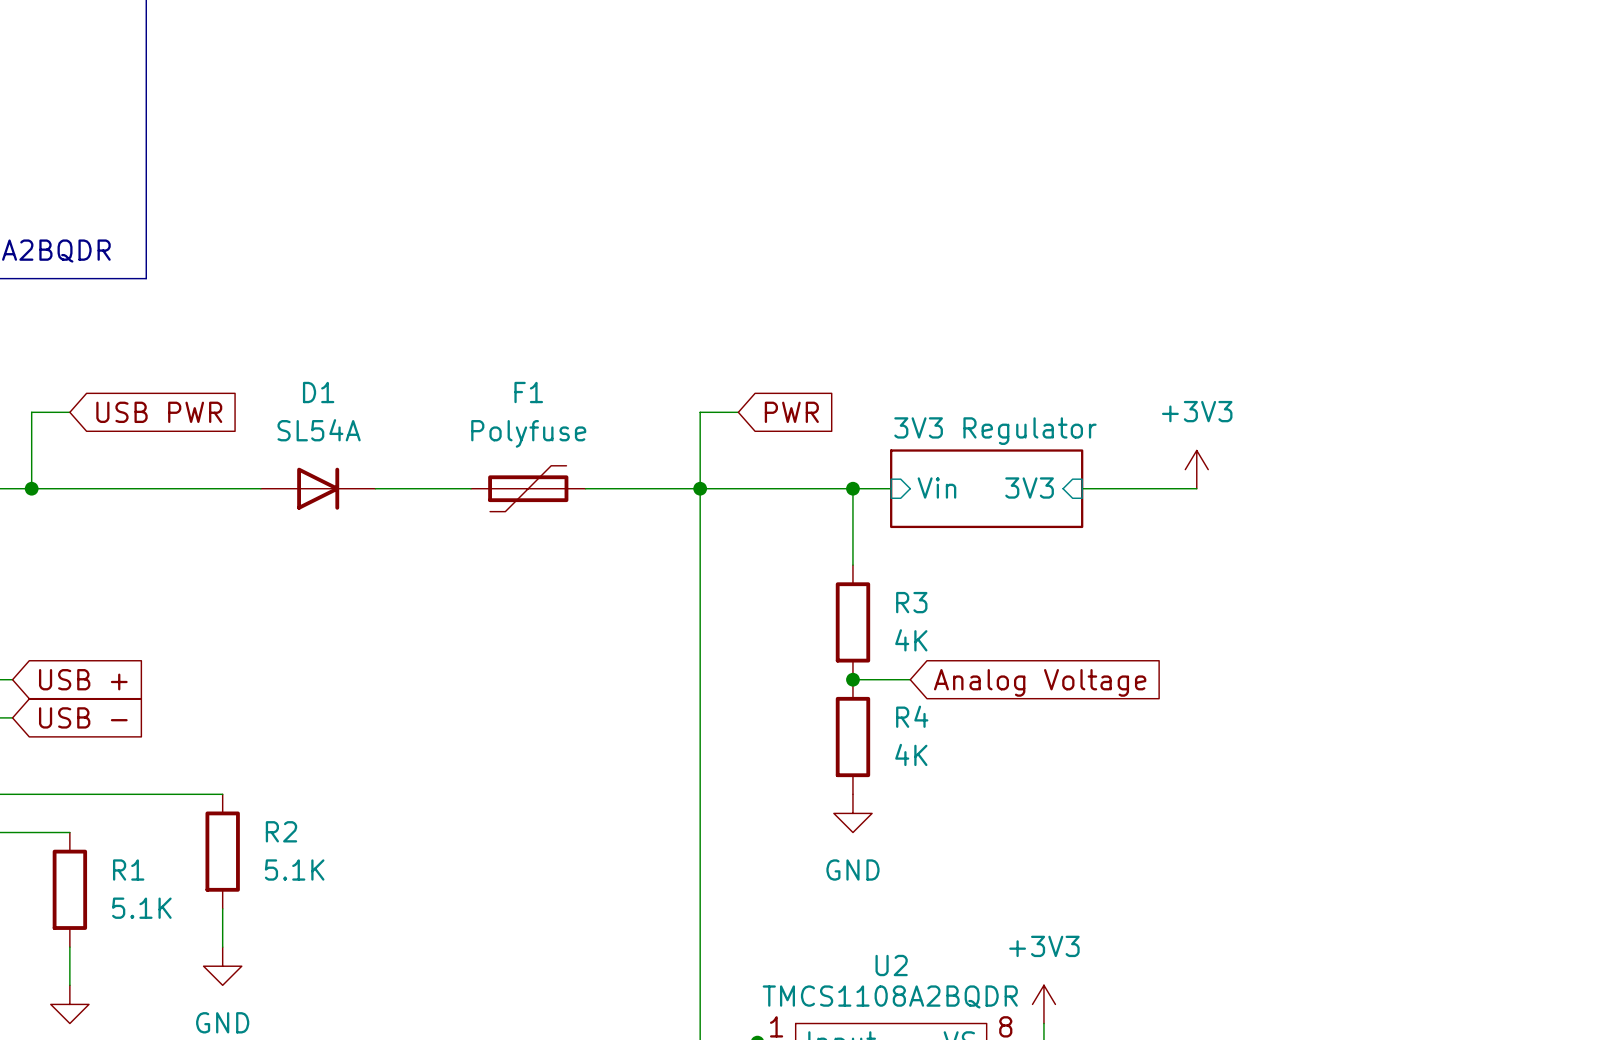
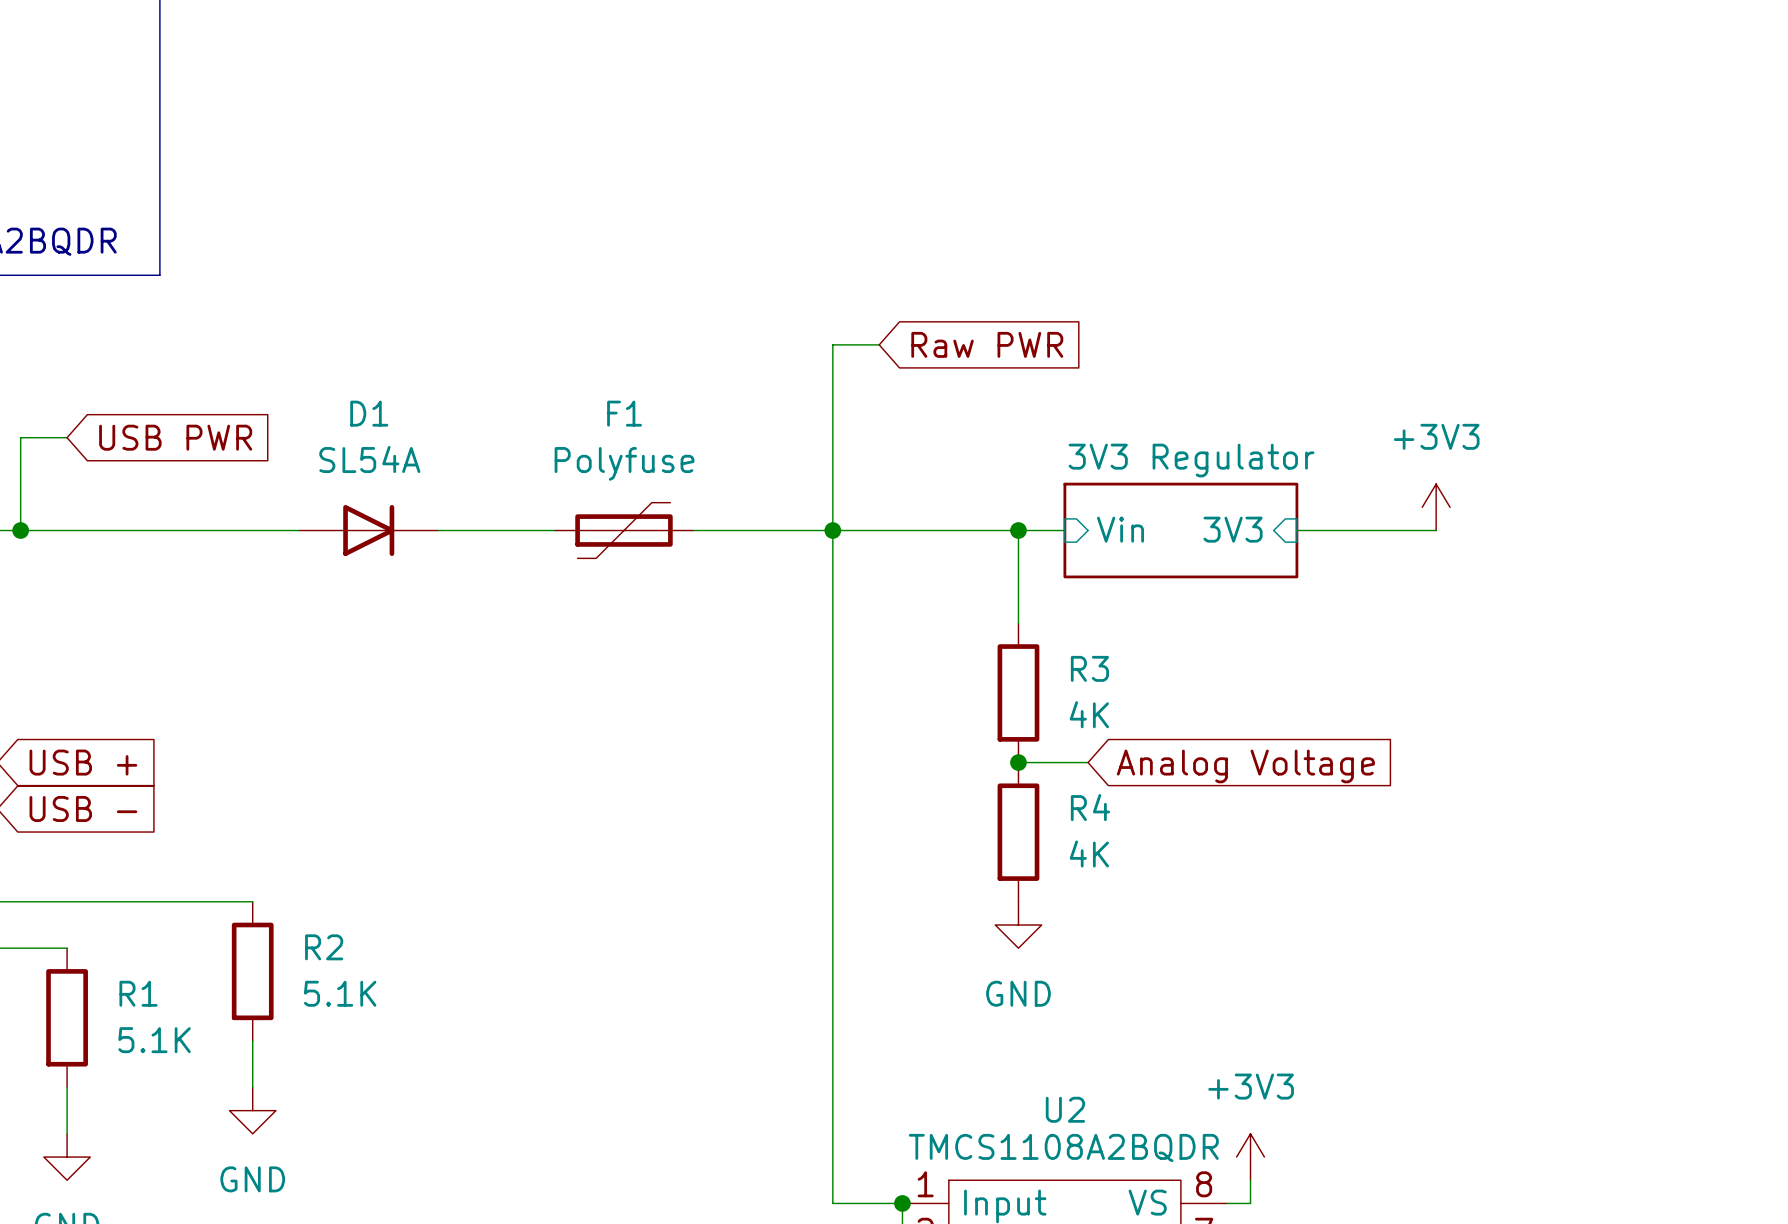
global label: none -> Raw PWR (987, 344)
wire: (700, 412) (738, 412) -> (832, 437) (832, 344) (879, 344)
global label: PWR (791, 412) -> none

